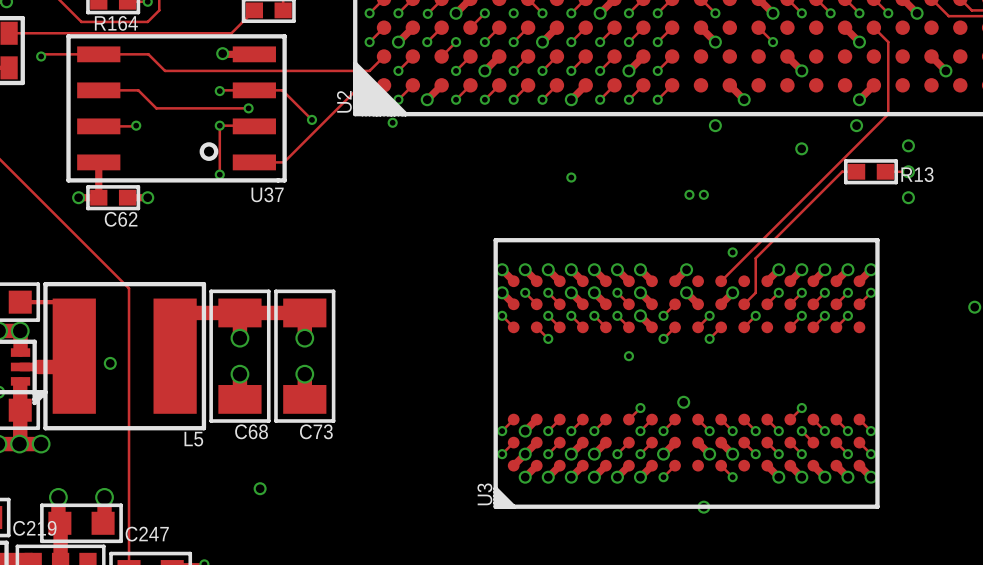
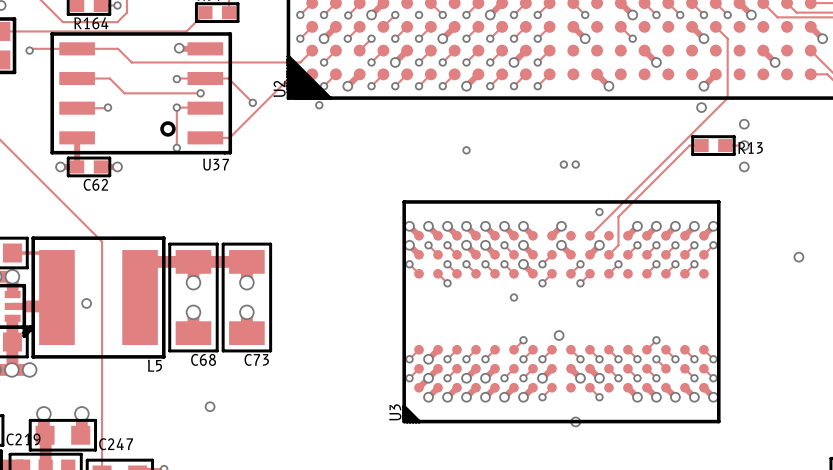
via: (715, 125) -> none
via: (801, 148) -> none

